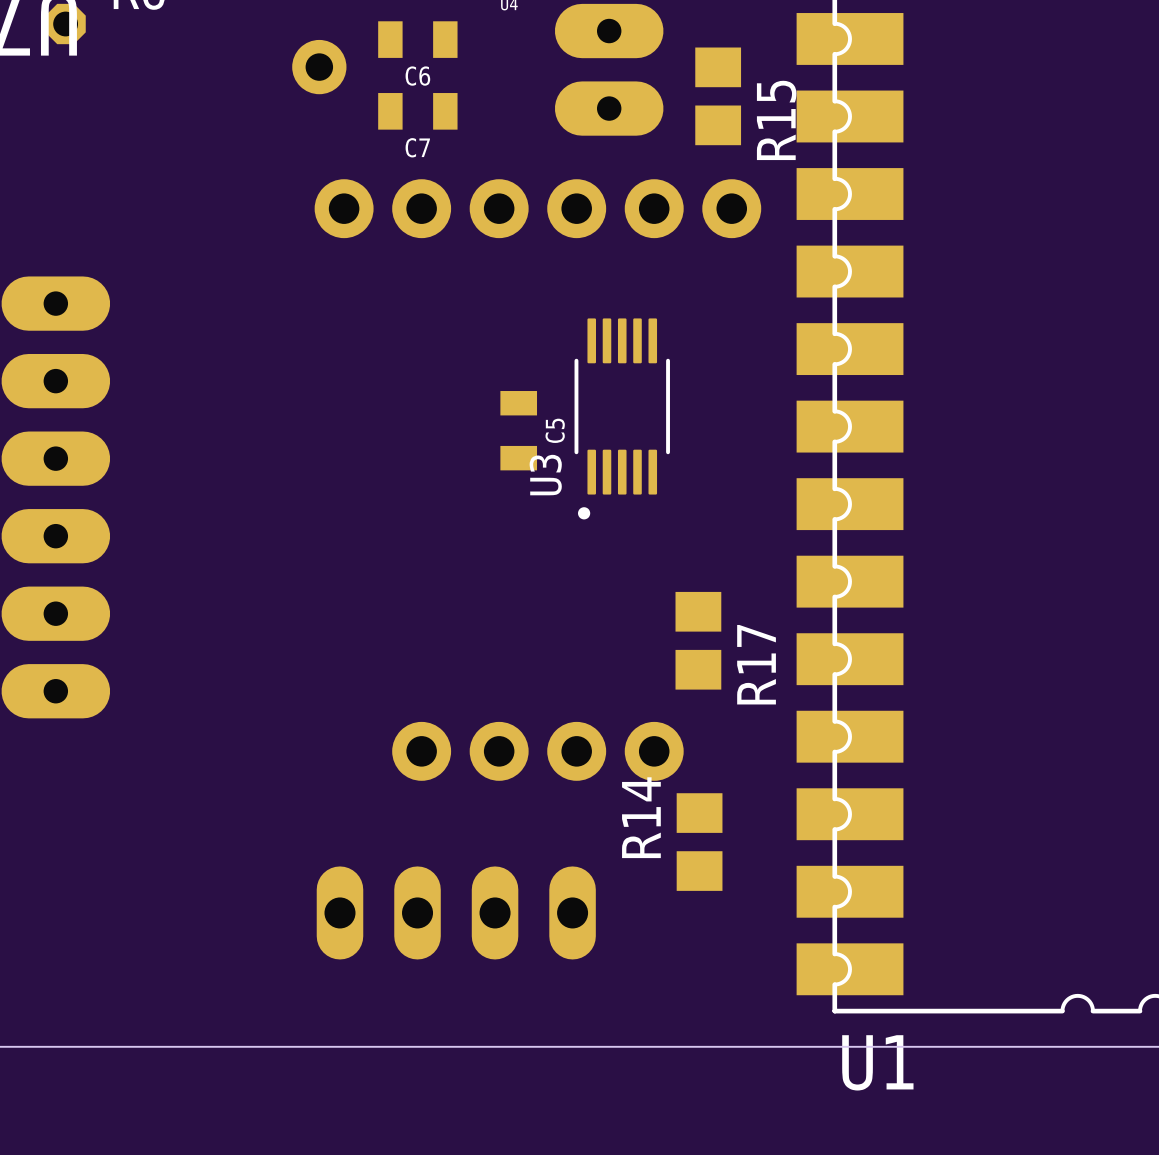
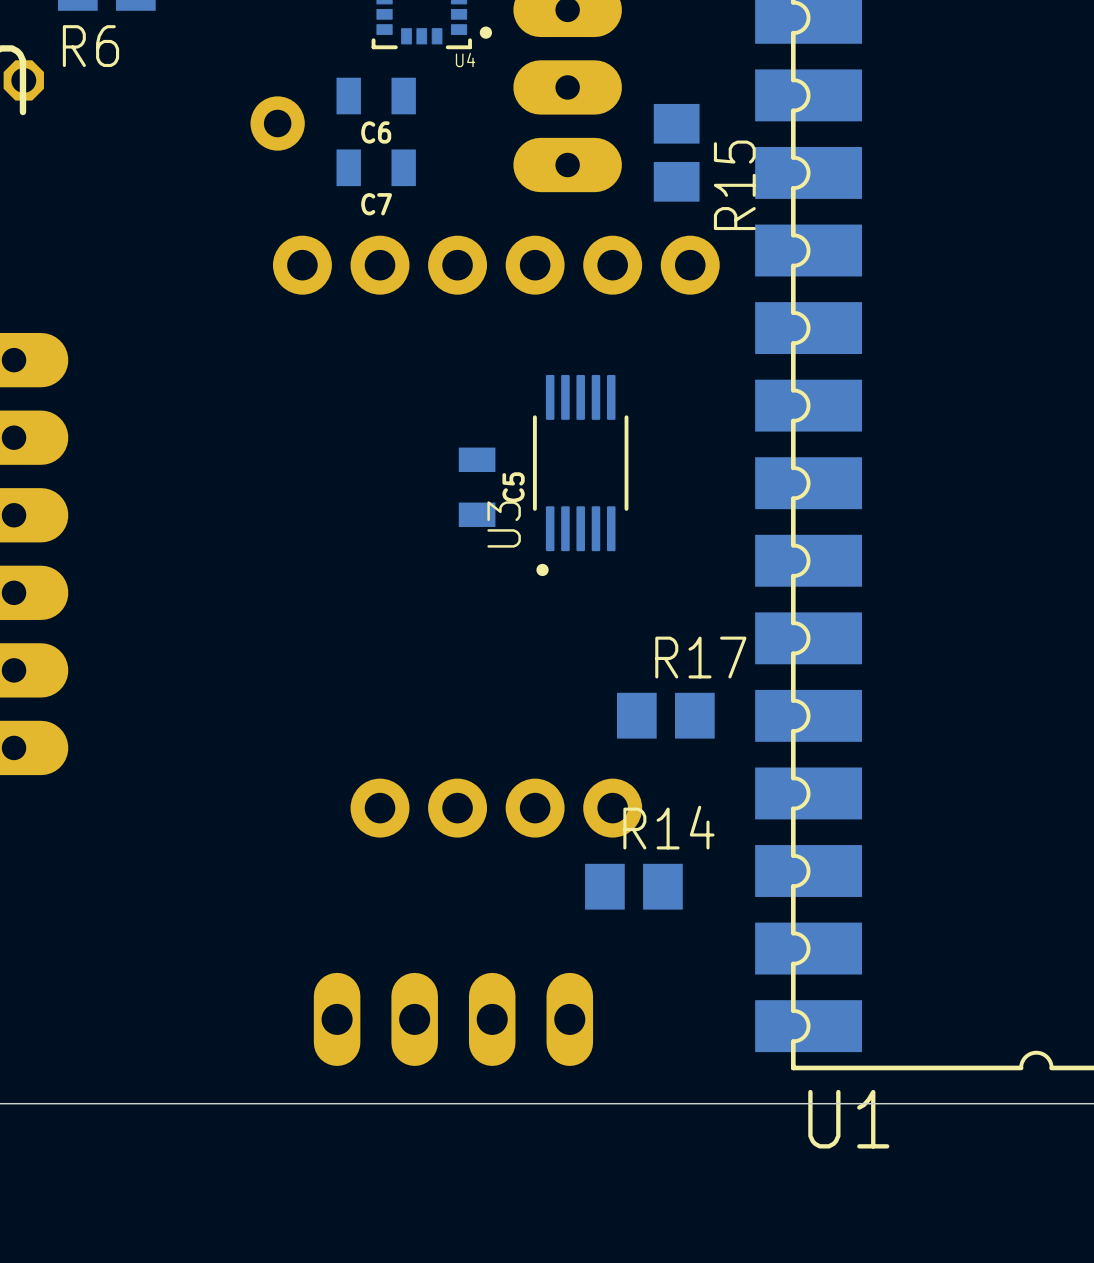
R17 rotation: 0° (698, 640) -> 90° clockwise (665, 715)
R17 name position: R17 (756, 664) -> R17 (700, 657)
R14 rotation: 0° (699, 842) -> 90° clockwise (633, 886)
part position: (456, 912) -> (453, 1019)

